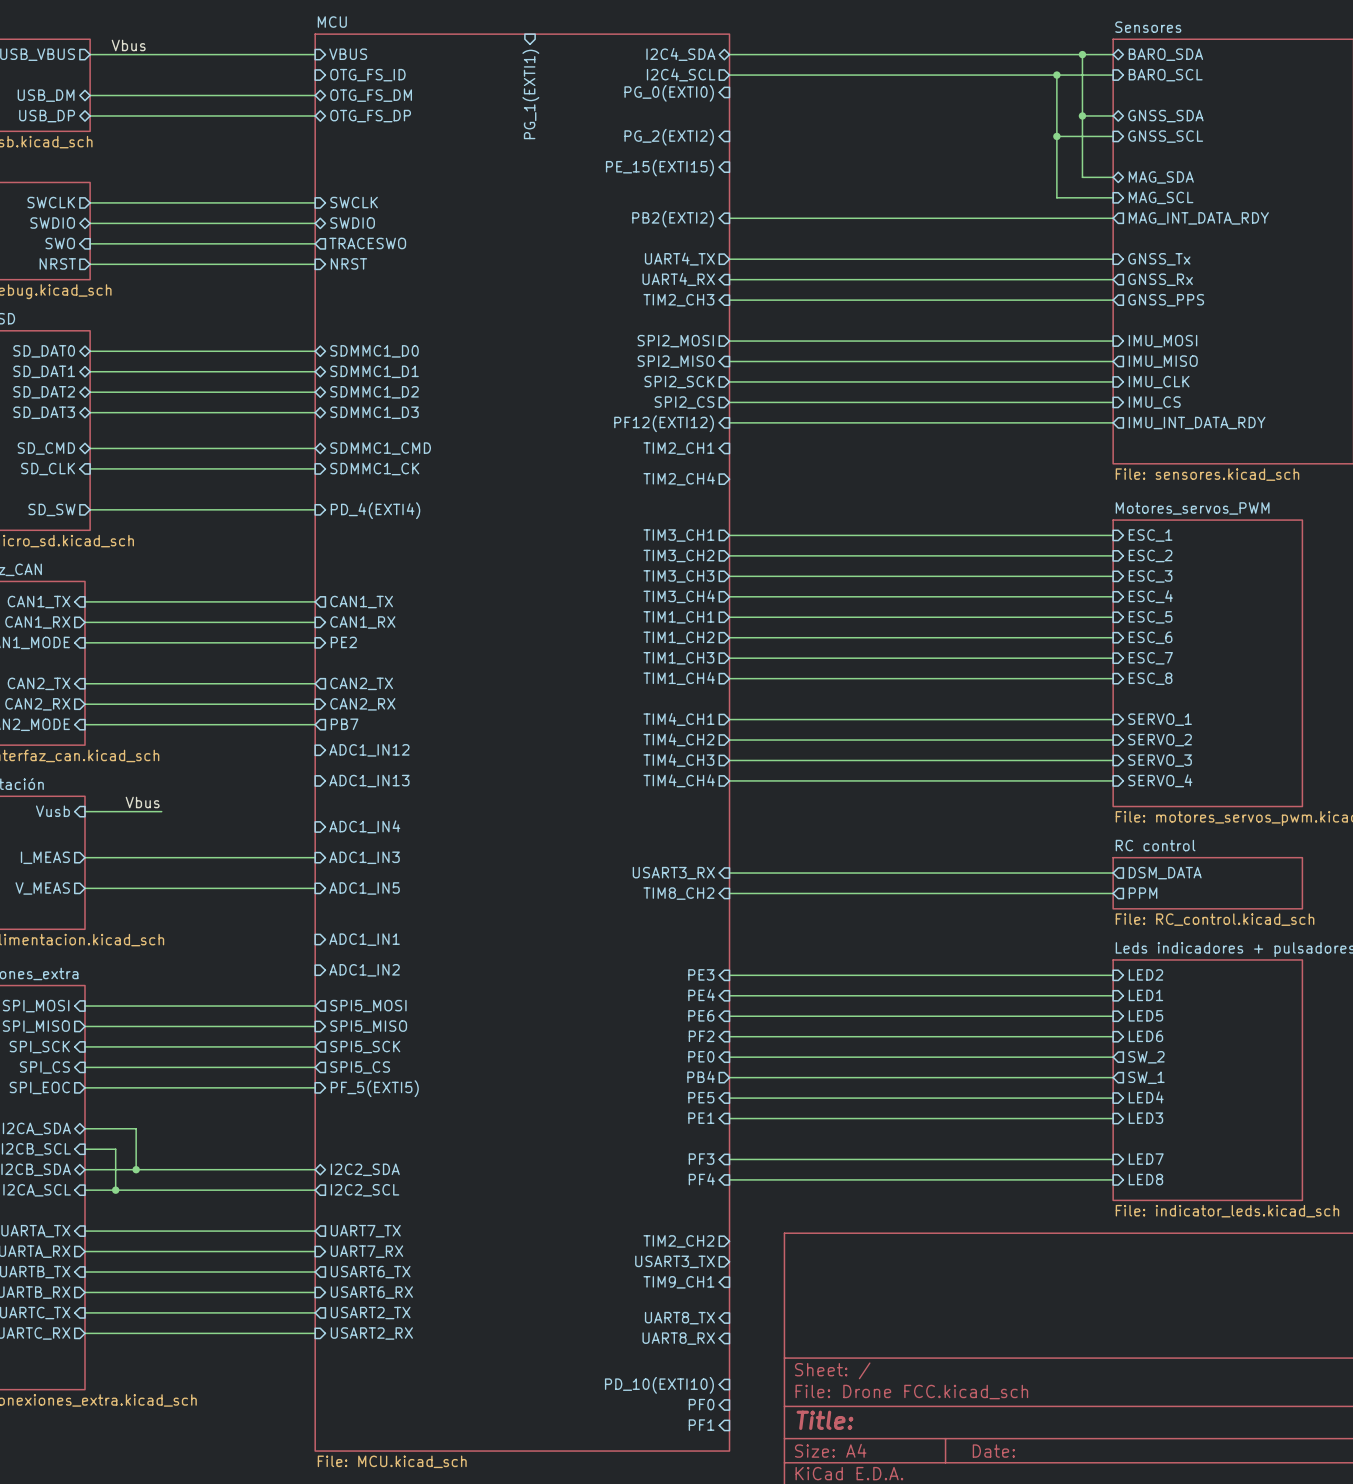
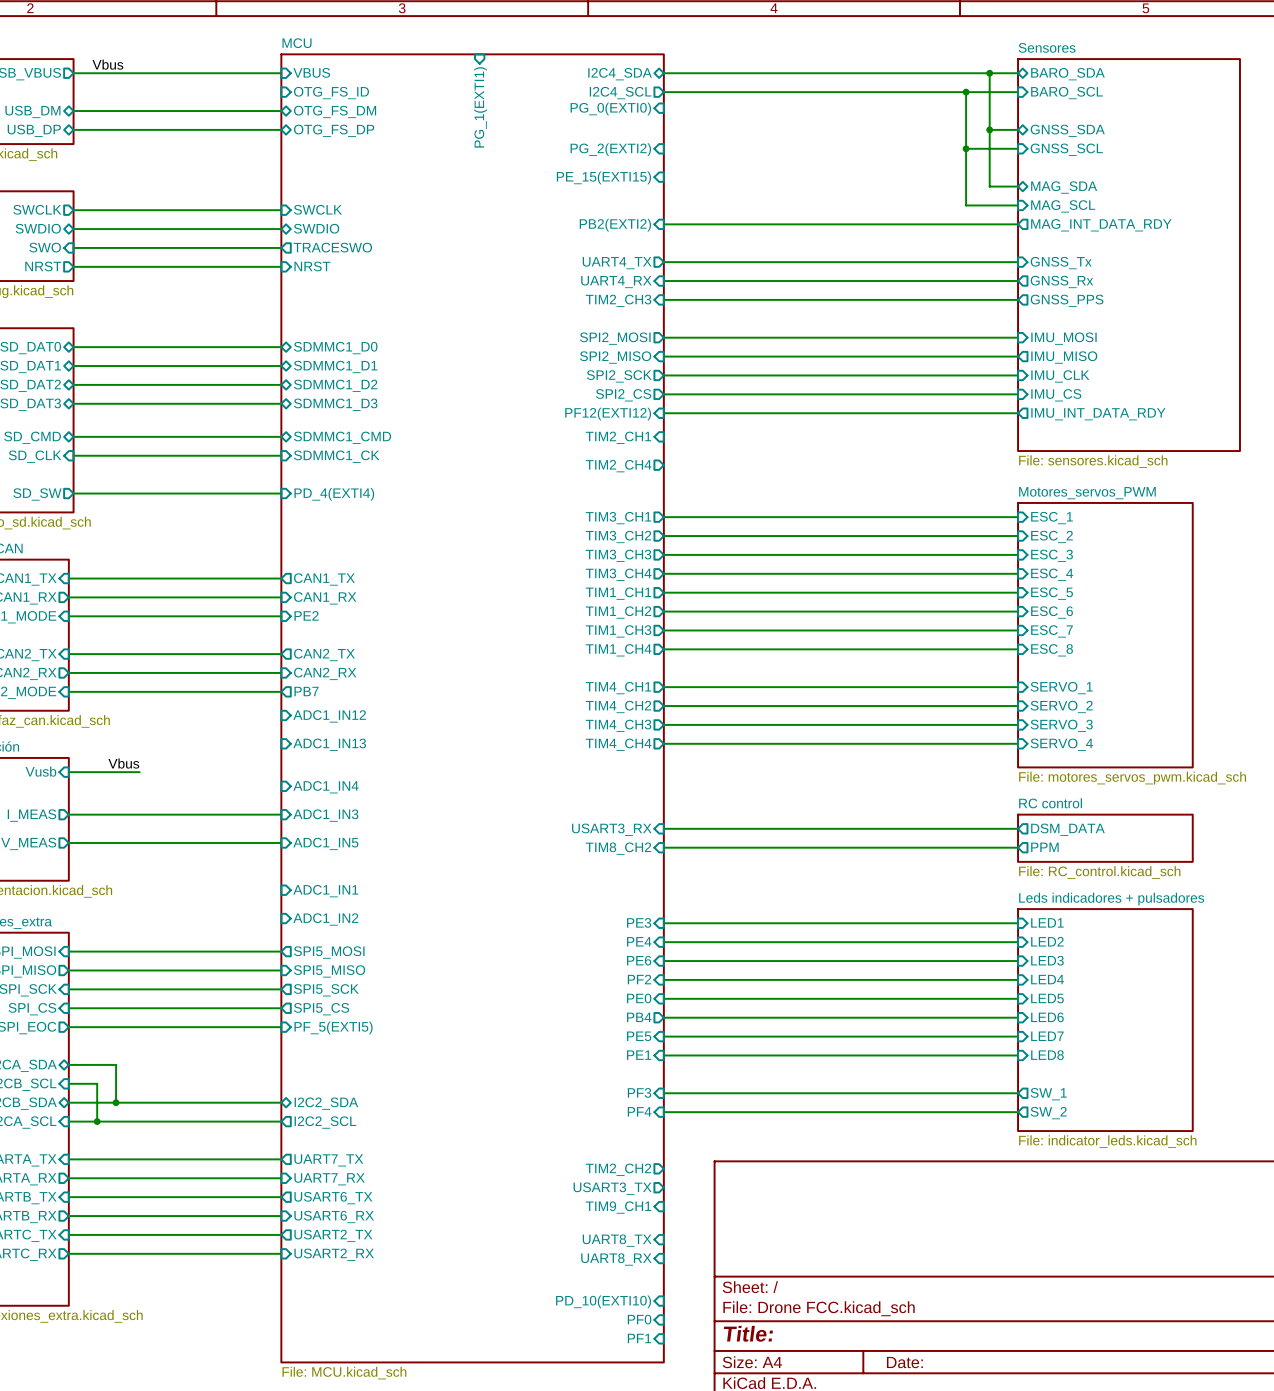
sheet pin: LED2 (1145, 974) -> LED1 (1047, 922)
sheet pin: LED1 (1145, 995) -> LED2 (1047, 941)
sheet pin: LED5 (1145, 1015) -> LED3 (1047, 960)
sheet pin: LED6 (1145, 1036) -> LED4 (1047, 979)
sheet pin shape: output (1146, 1057) -> input (1047, 998)
sheet pin: SW_2 (1146, 1057) -> LED5 (1047, 998)
sheet pin shape: output (1146, 1077) -> input (1047, 1017)
sheet pin: SW_1 (1146, 1077) -> LED6 (1047, 1017)
sheet pin: LED4 (1146, 1097) -> LED7 (1047, 1036)
sheet pin: LED3 (1145, 1118) -> LED8 (1047, 1055)
sheet pin shape: input (1146, 1159) -> output (1048, 1094)
sheet pin: LED7 (1146, 1159) -> SW_1 (1048, 1094)
sheet pin shape: input (1145, 1179) -> output (1048, 1113)
sheet pin: LED8 (1145, 1179) -> SW_2 (1048, 1113)

